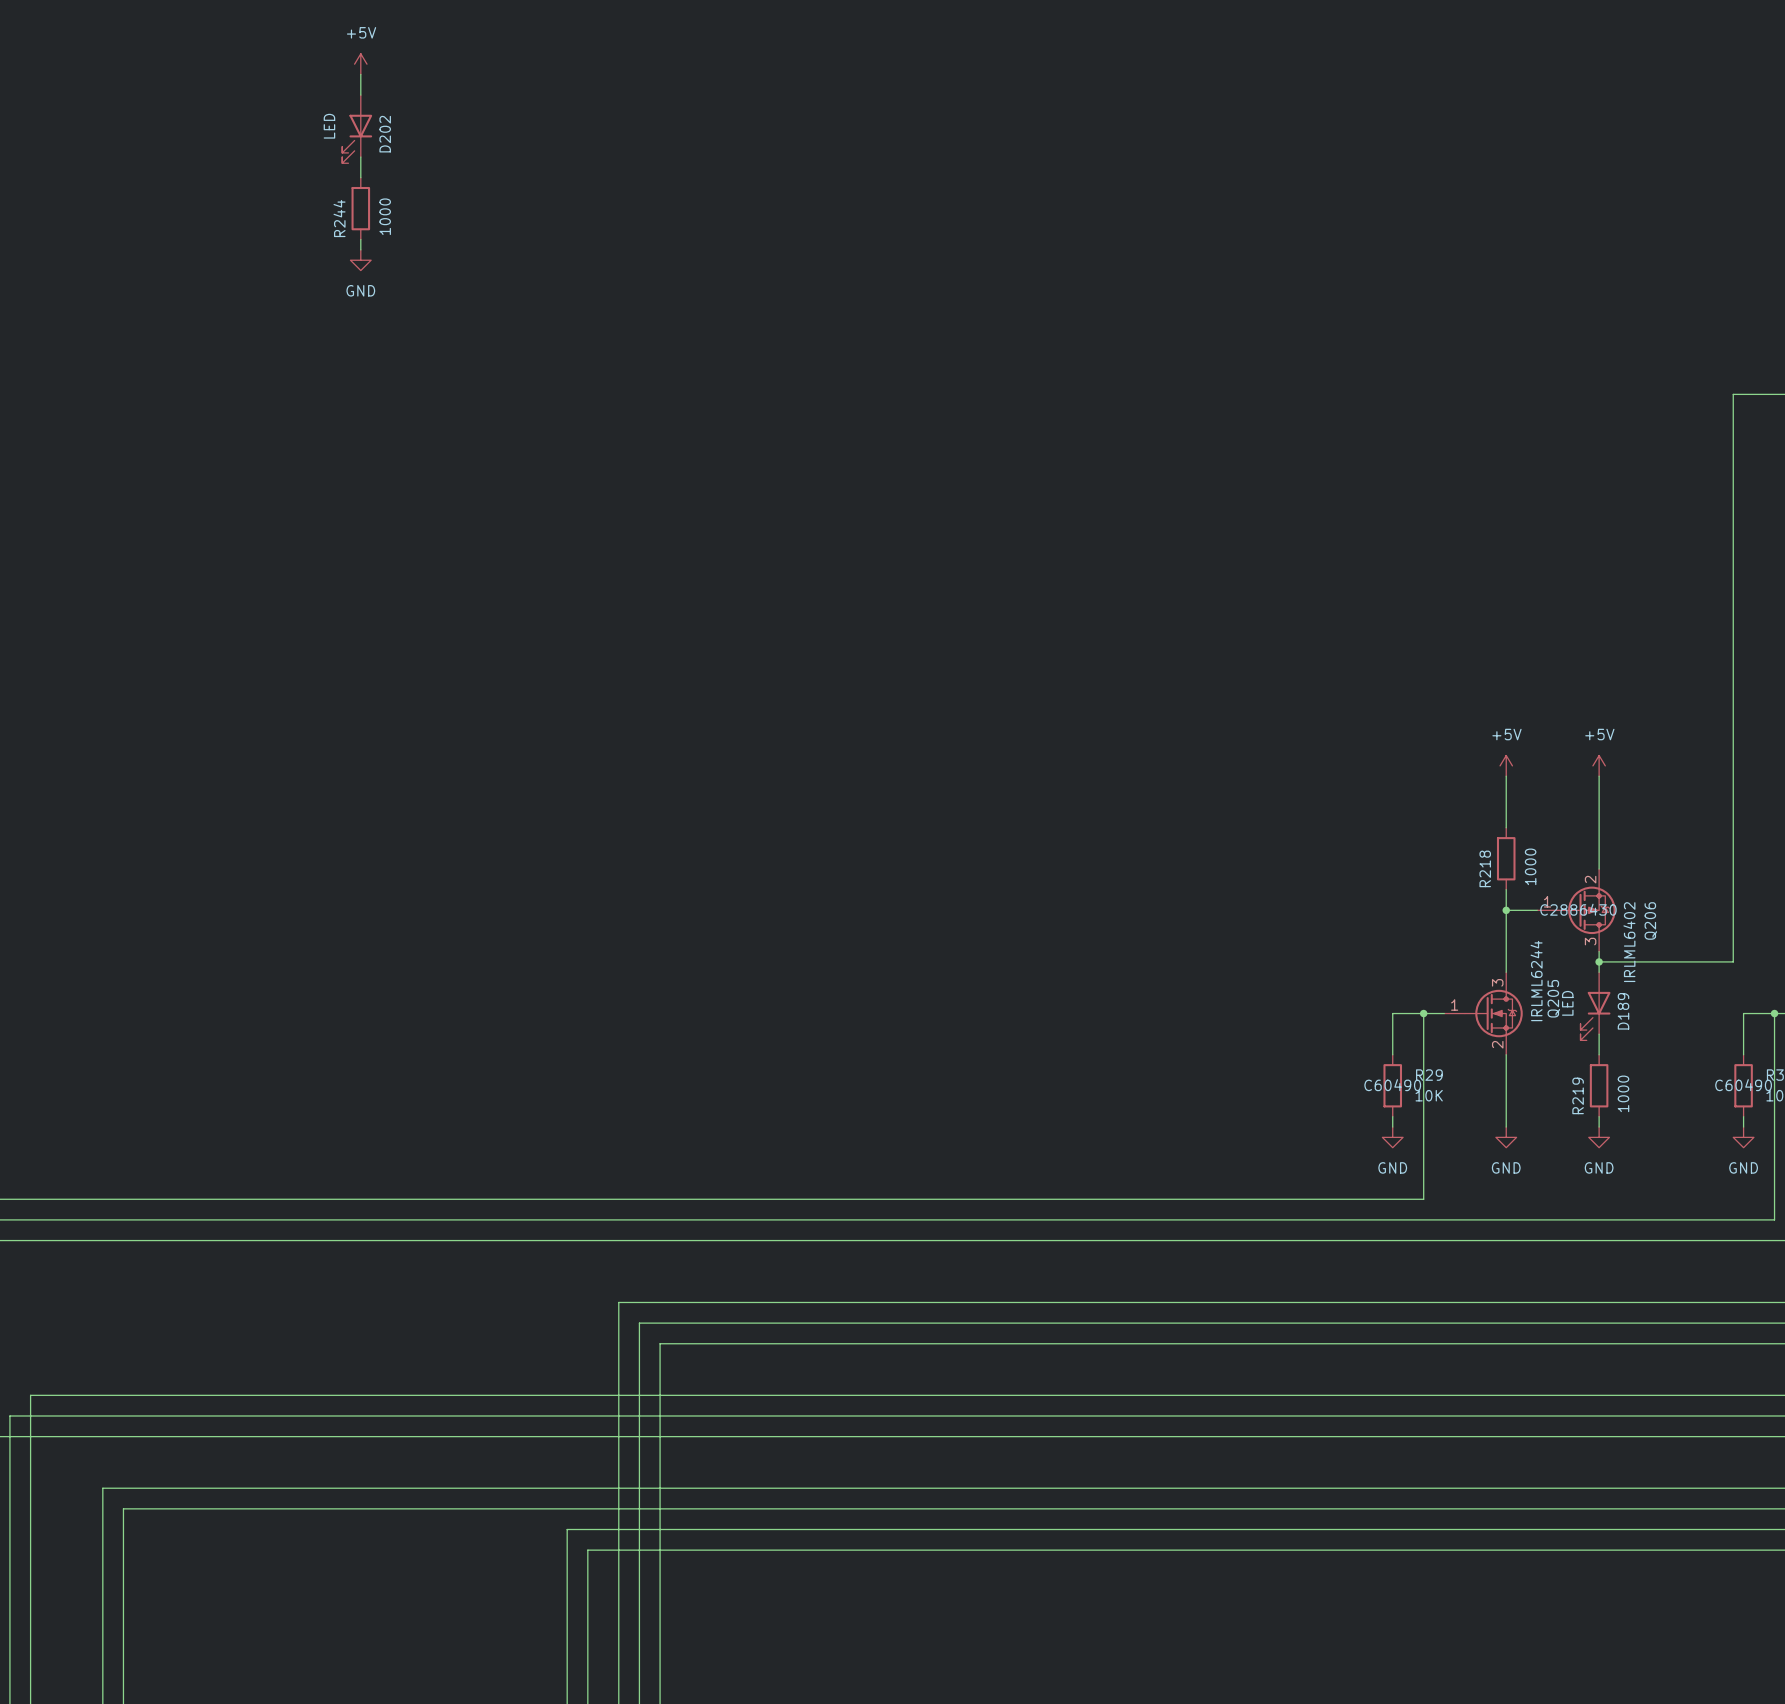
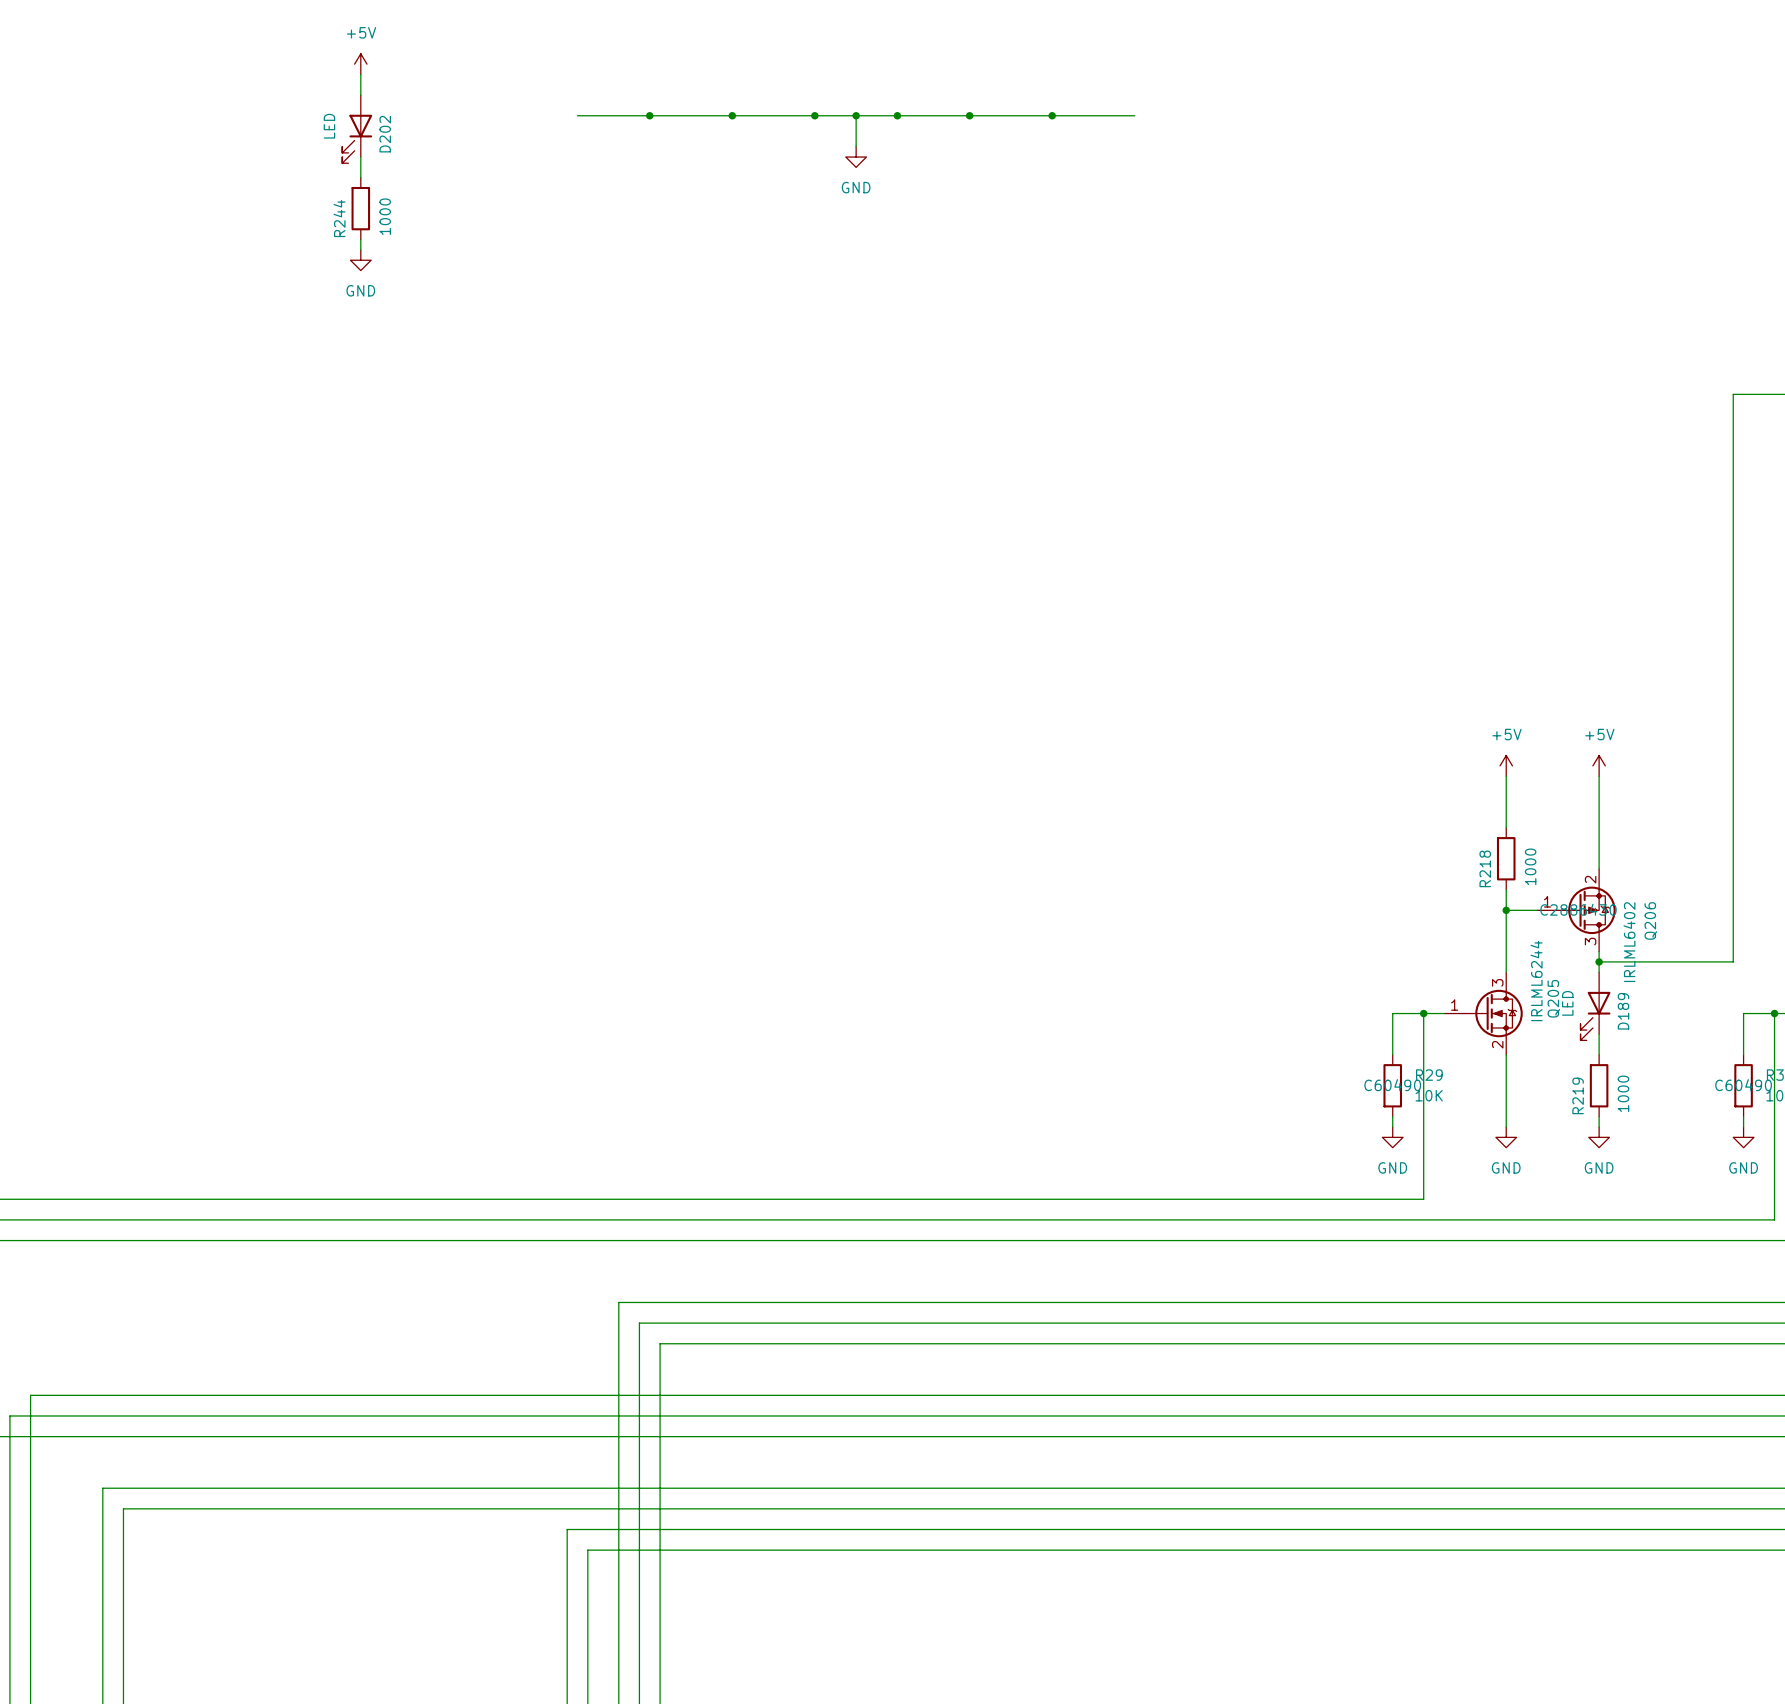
wire: none -> (577, 115) (1134, 115)
junction: none -> (649, 115)
junction: none -> (732, 115)
junction: none -> (814, 115)
wire: none -> (856, 115) (856, 146)
junction: none -> (856, 115)
junction: none -> (897, 115)
junction: none -> (969, 115)
junction: none -> (1052, 115)
power symbol: none -> GND (856, 157)

